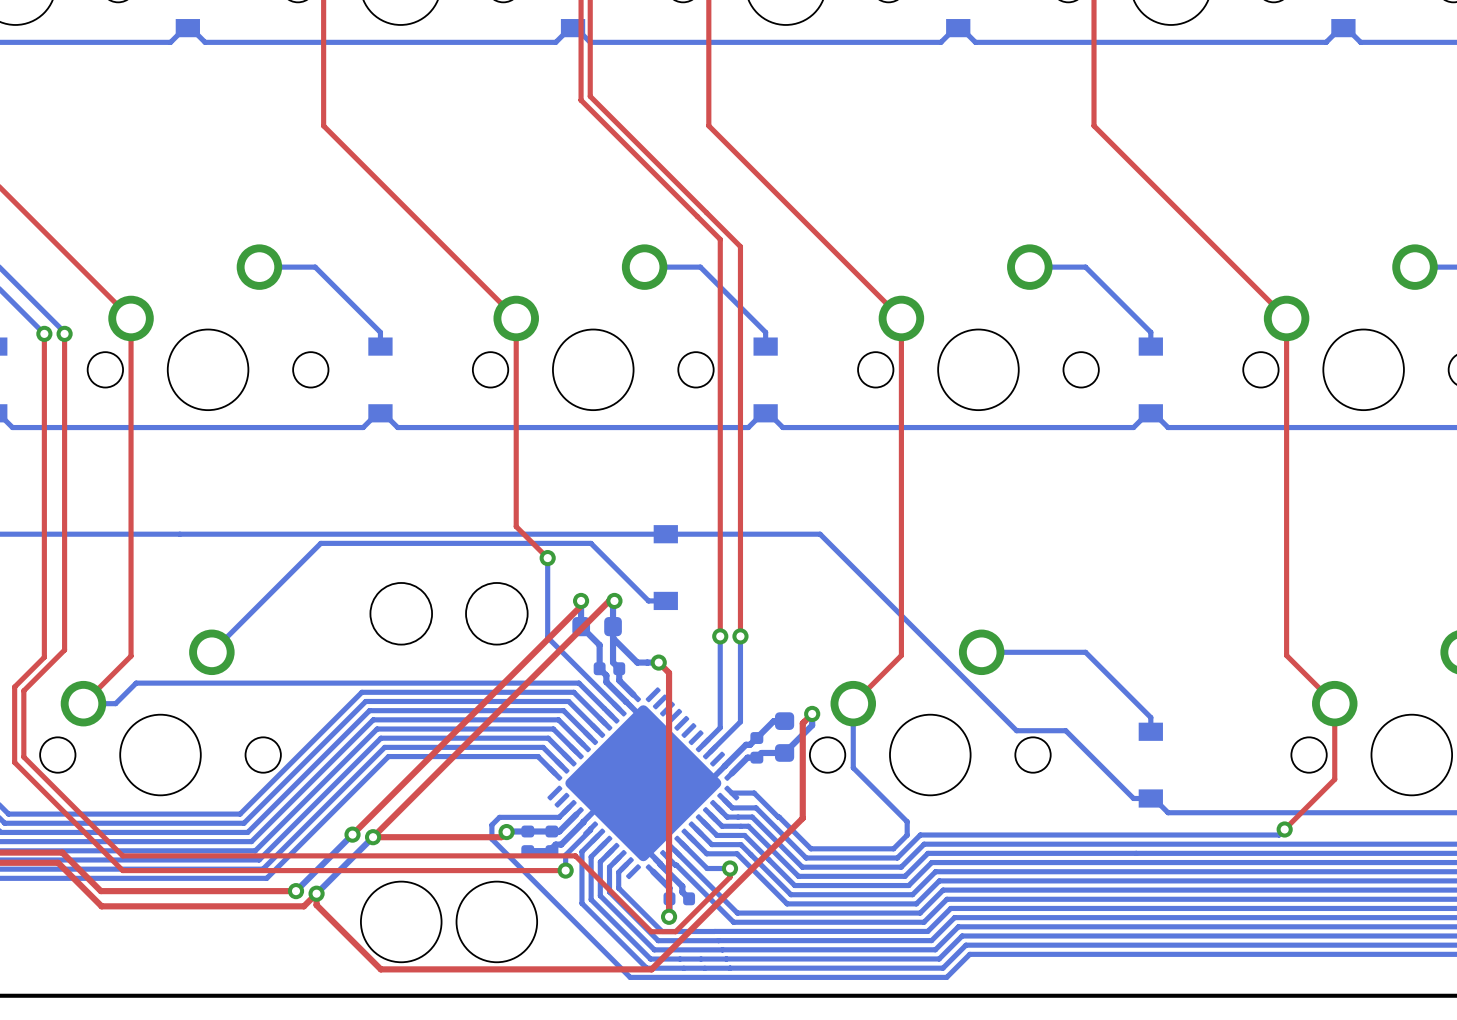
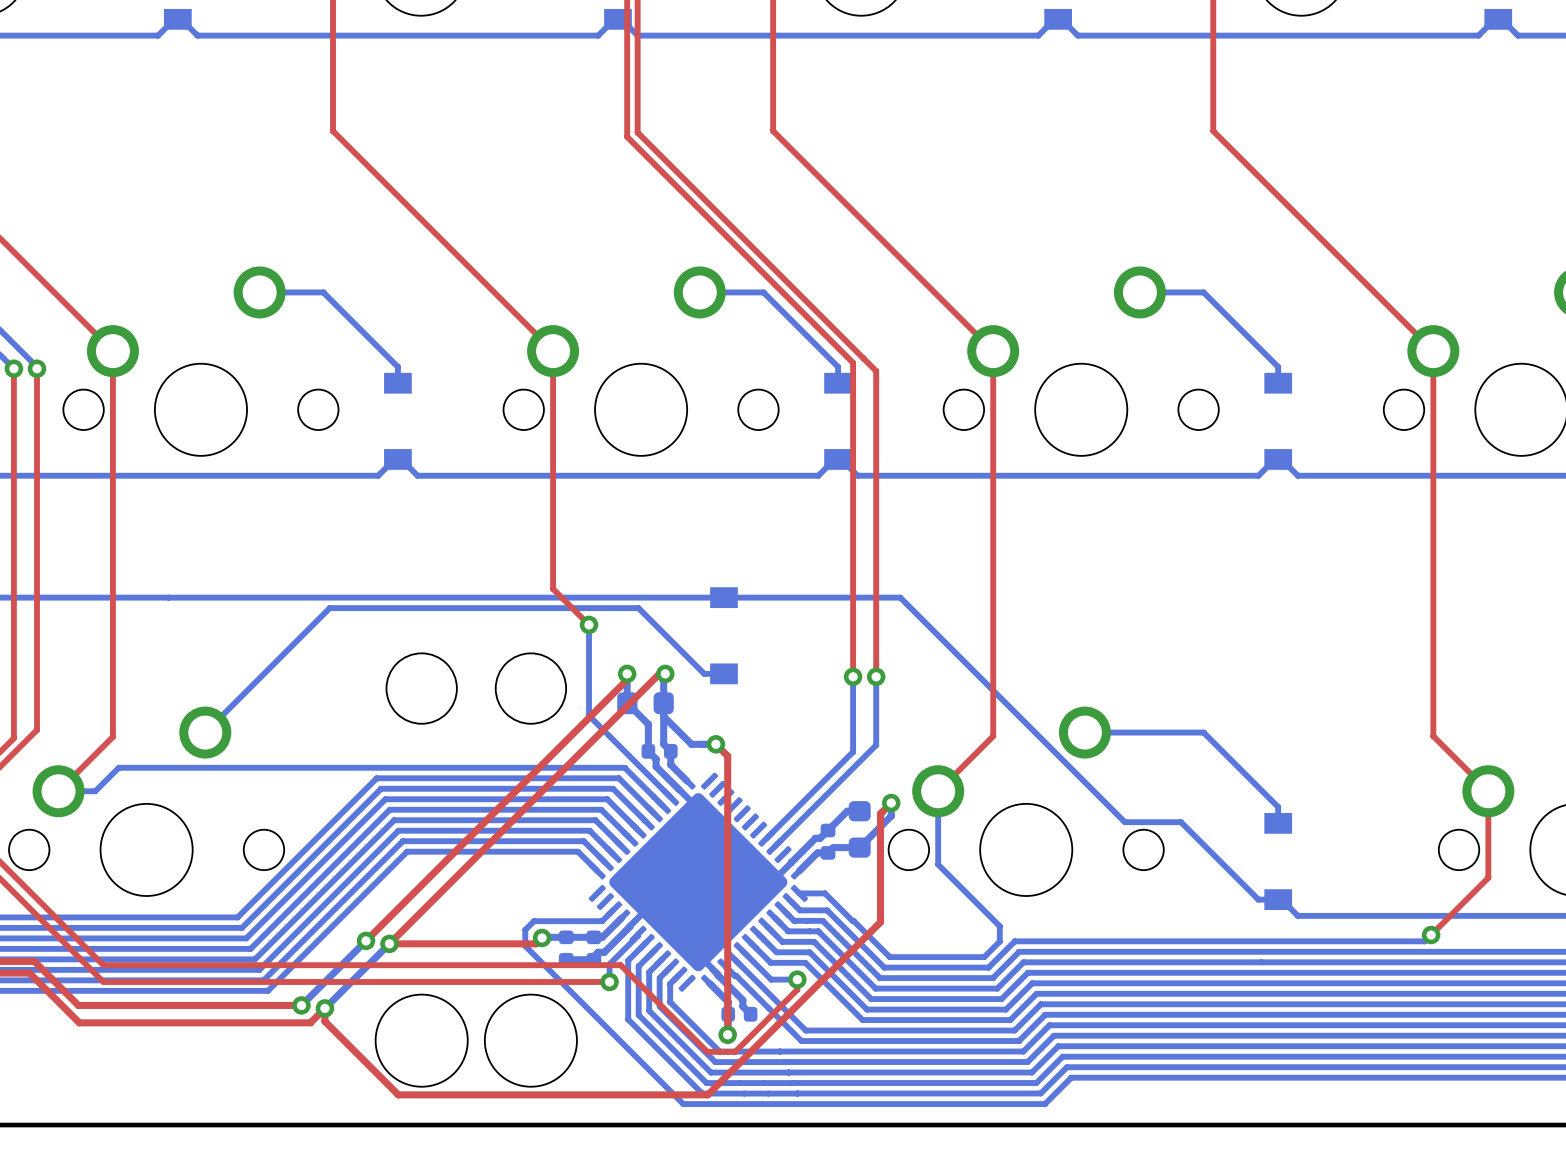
top track: (590, 96) (740, 246) (740, 636) -> (637, 97) (637, 132) (876, 371) (876, 676)
top track: (581, 100) (720, 239) (720, 636) -> (627, 101) (627, 136) (853, 362) (853, 676)
via: none -> (853, 676)
via: none -> (876, 676)
bottom track: (720, 636) (720, 727) -> (853, 676) (853, 751) (786, 818)
via: (720, 636) -> none
bottom track: (740, 636) (740, 721) -> (876, 676) (876, 745) (809, 812)
via: (740, 636) -> none

